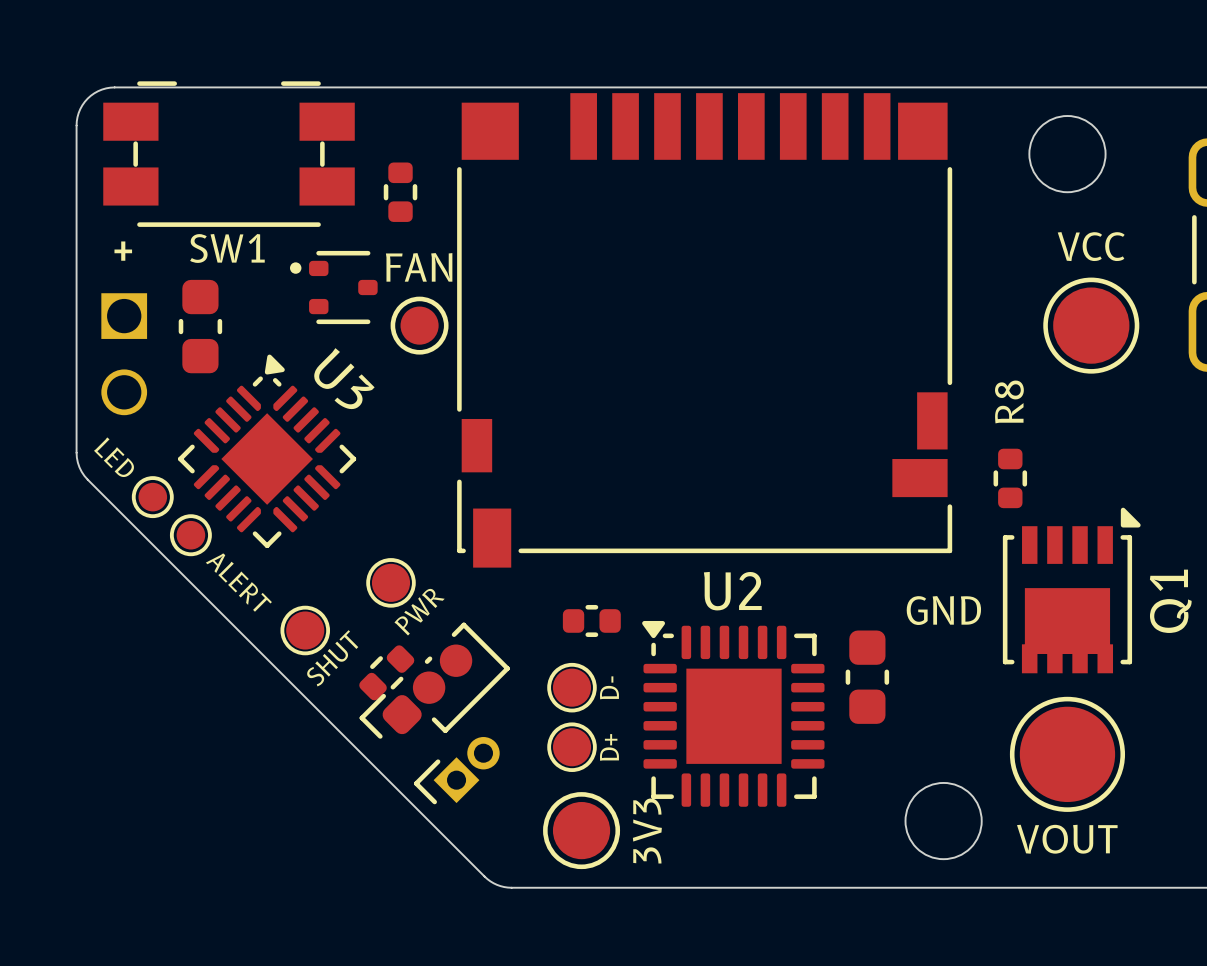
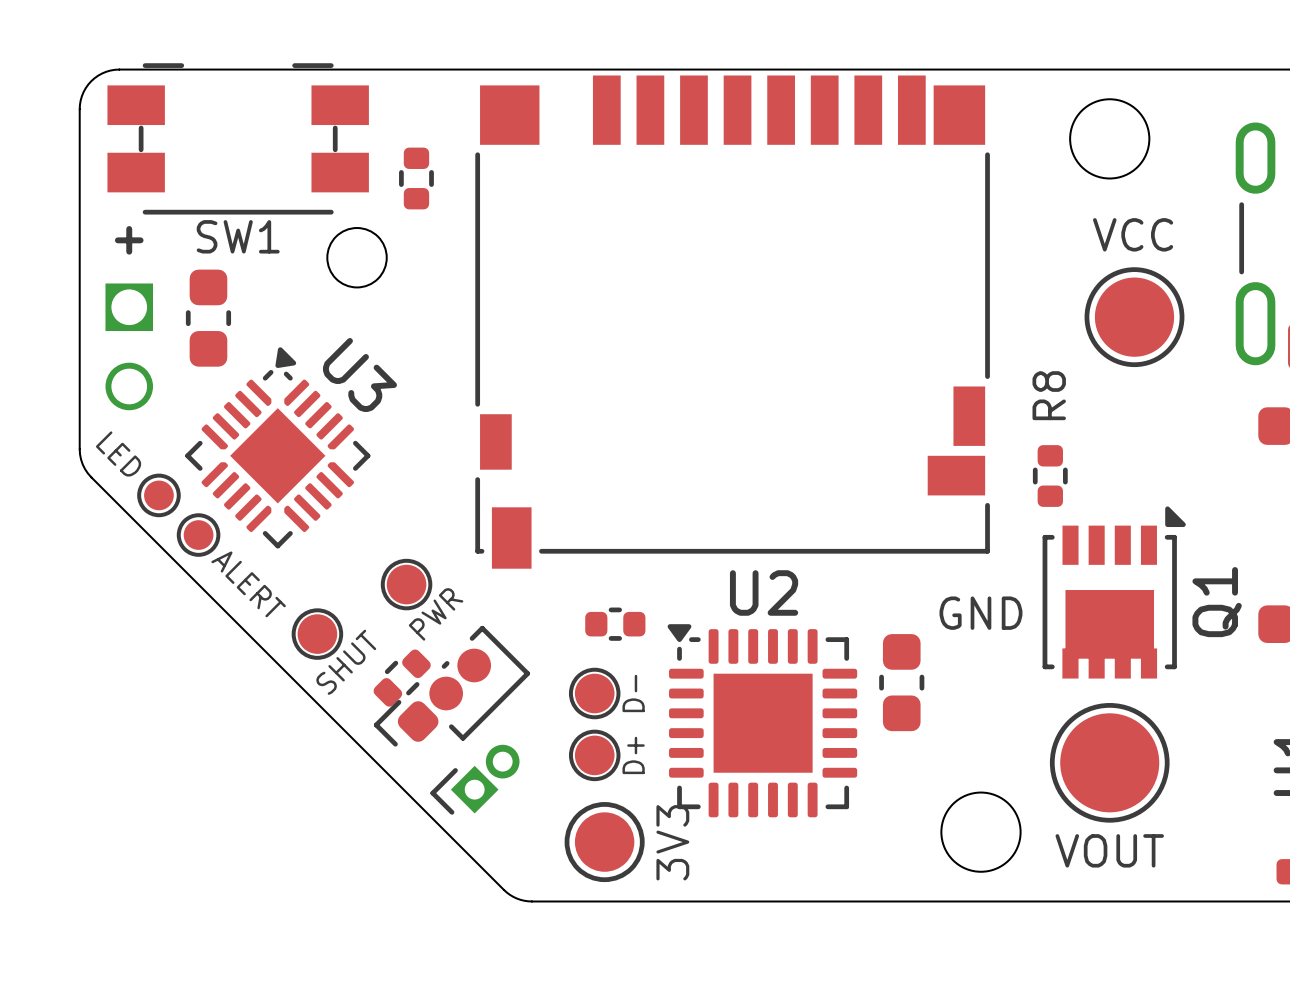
round board edge: none -> [326, 227, 388, 289]
part: (333, 287) -> none
part: FAN (419, 325) -> none

